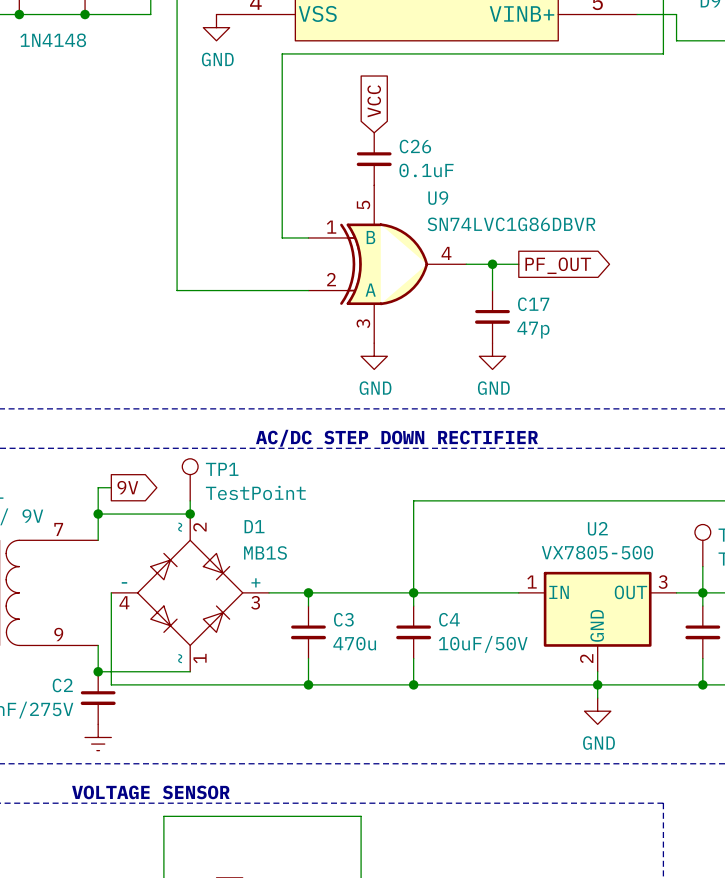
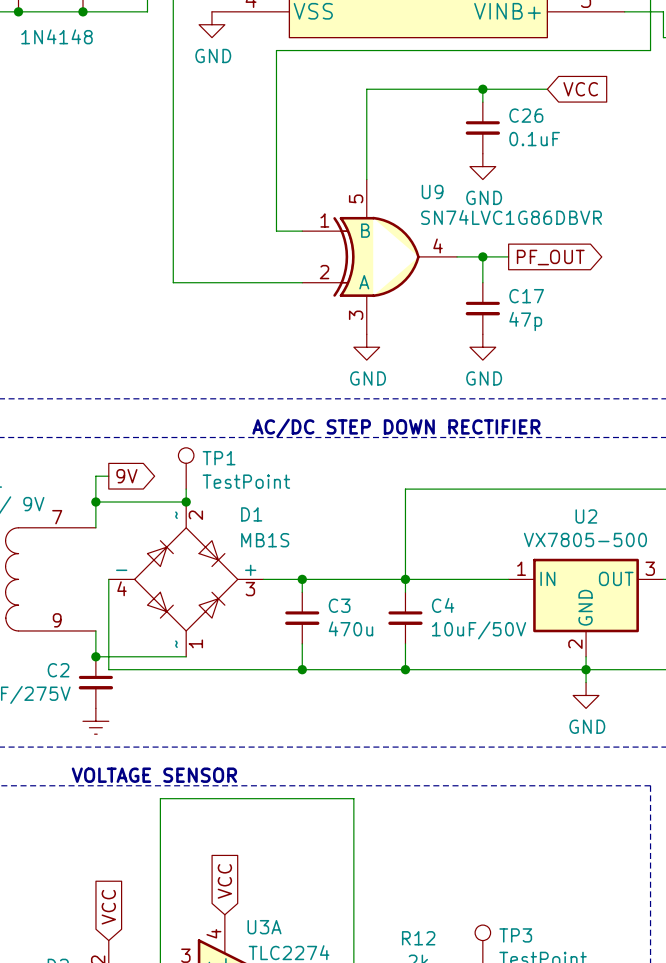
wire: none -> (482, 89) (482, 102)
junction: none -> (482, 89)
wire: none -> (547, 89) (366, 89) (366, 179)
global label rotation: 0° (374, 101) -> 90° clockwise (580, 89)
global label position: VCC (374, 101) -> VCC (580, 89)
C26 position: (374, 159) -> (482, 127)
power symbol: none -> GND (482, 166)

